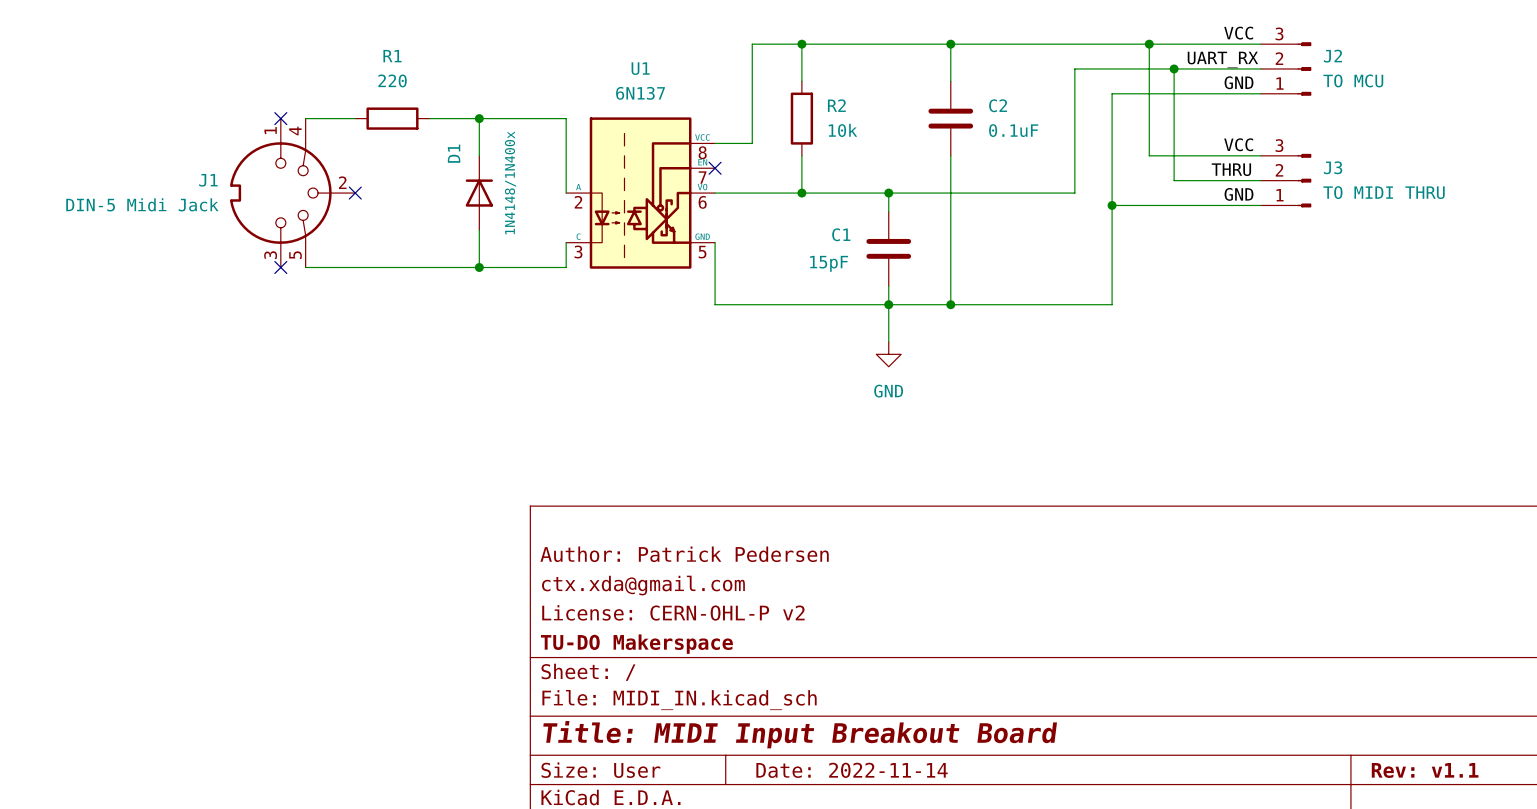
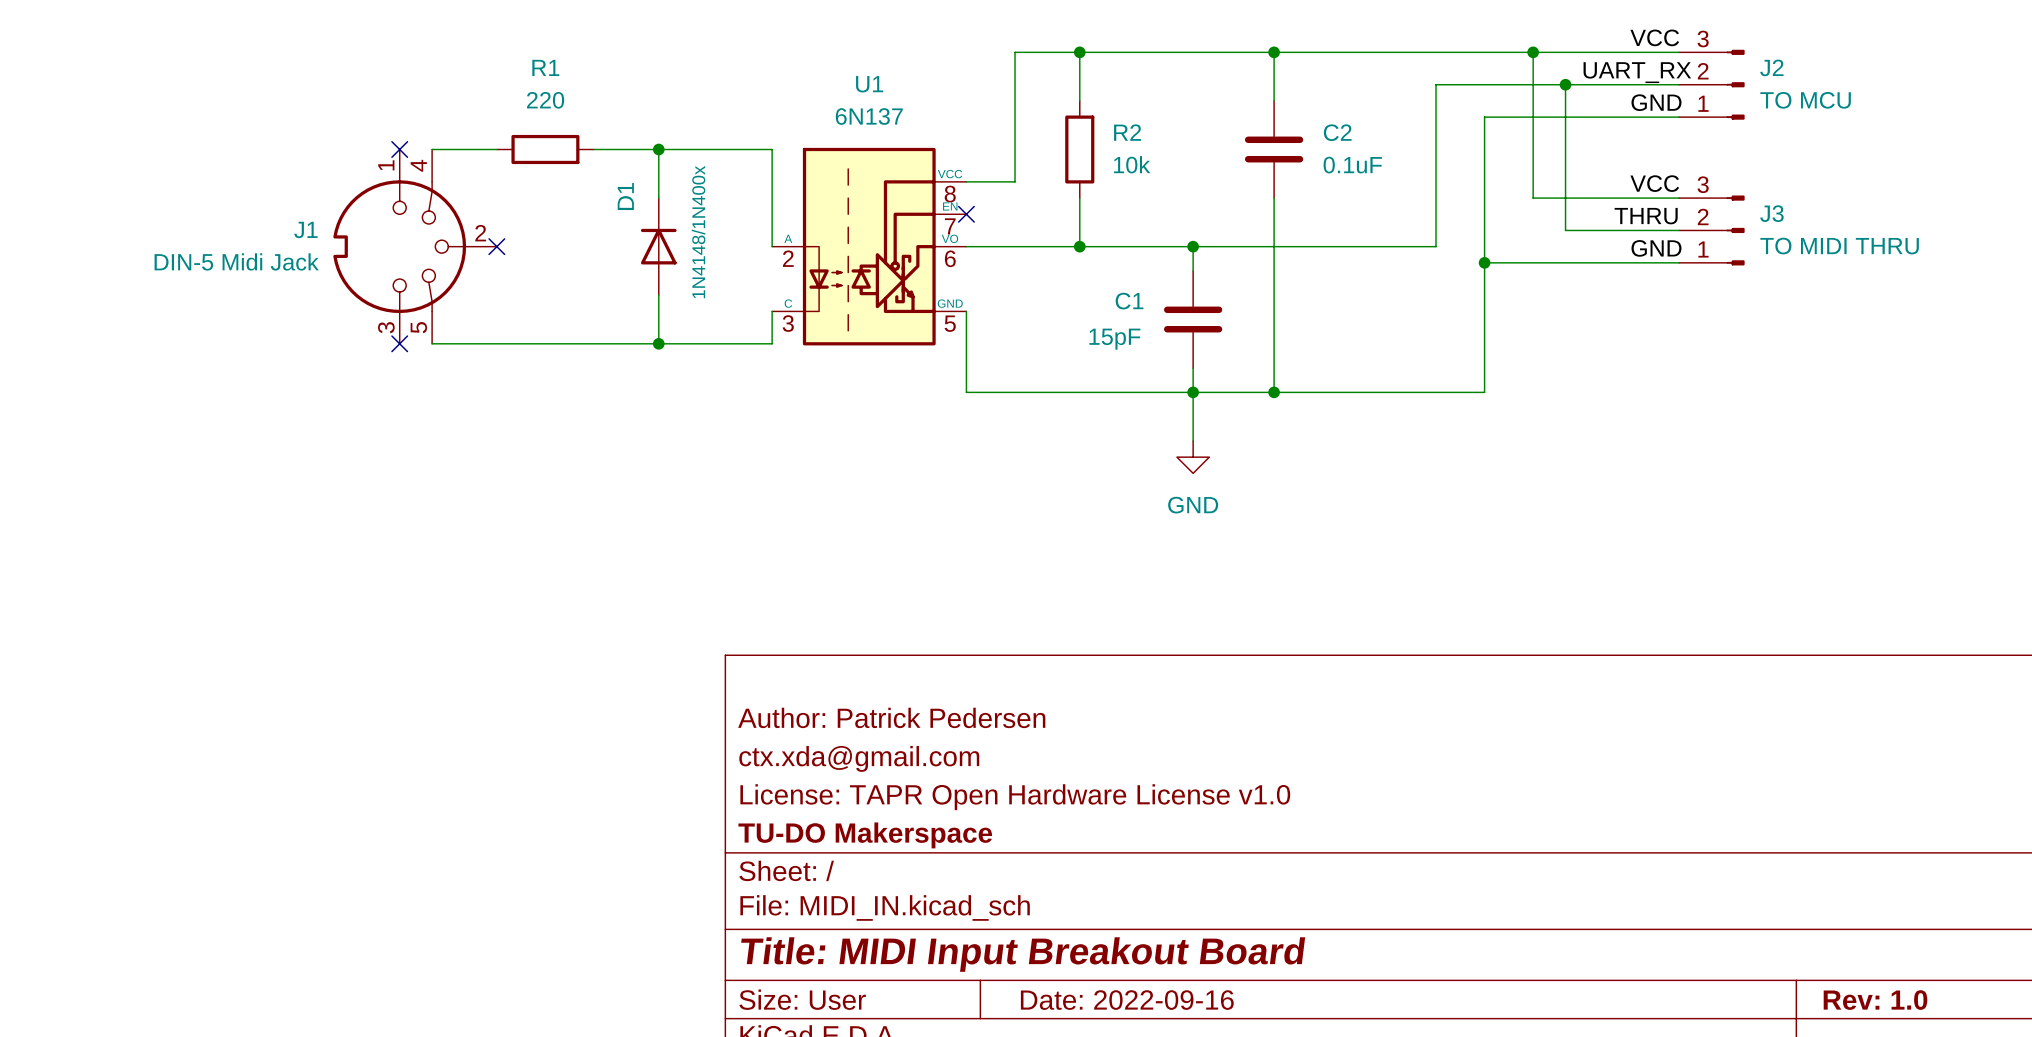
title block: License: CERN-OHL-P v2 (673, 612) -> License: TAPR Open Hardware License v1.0 (1015, 797)
title block: Date: 2022-11-14 (852, 770) -> Date: 2022-09-16 (1127, 1000)
title block: Rev: v1.1 (1425, 770) -> Rev: 1.0 (1875, 1000)

